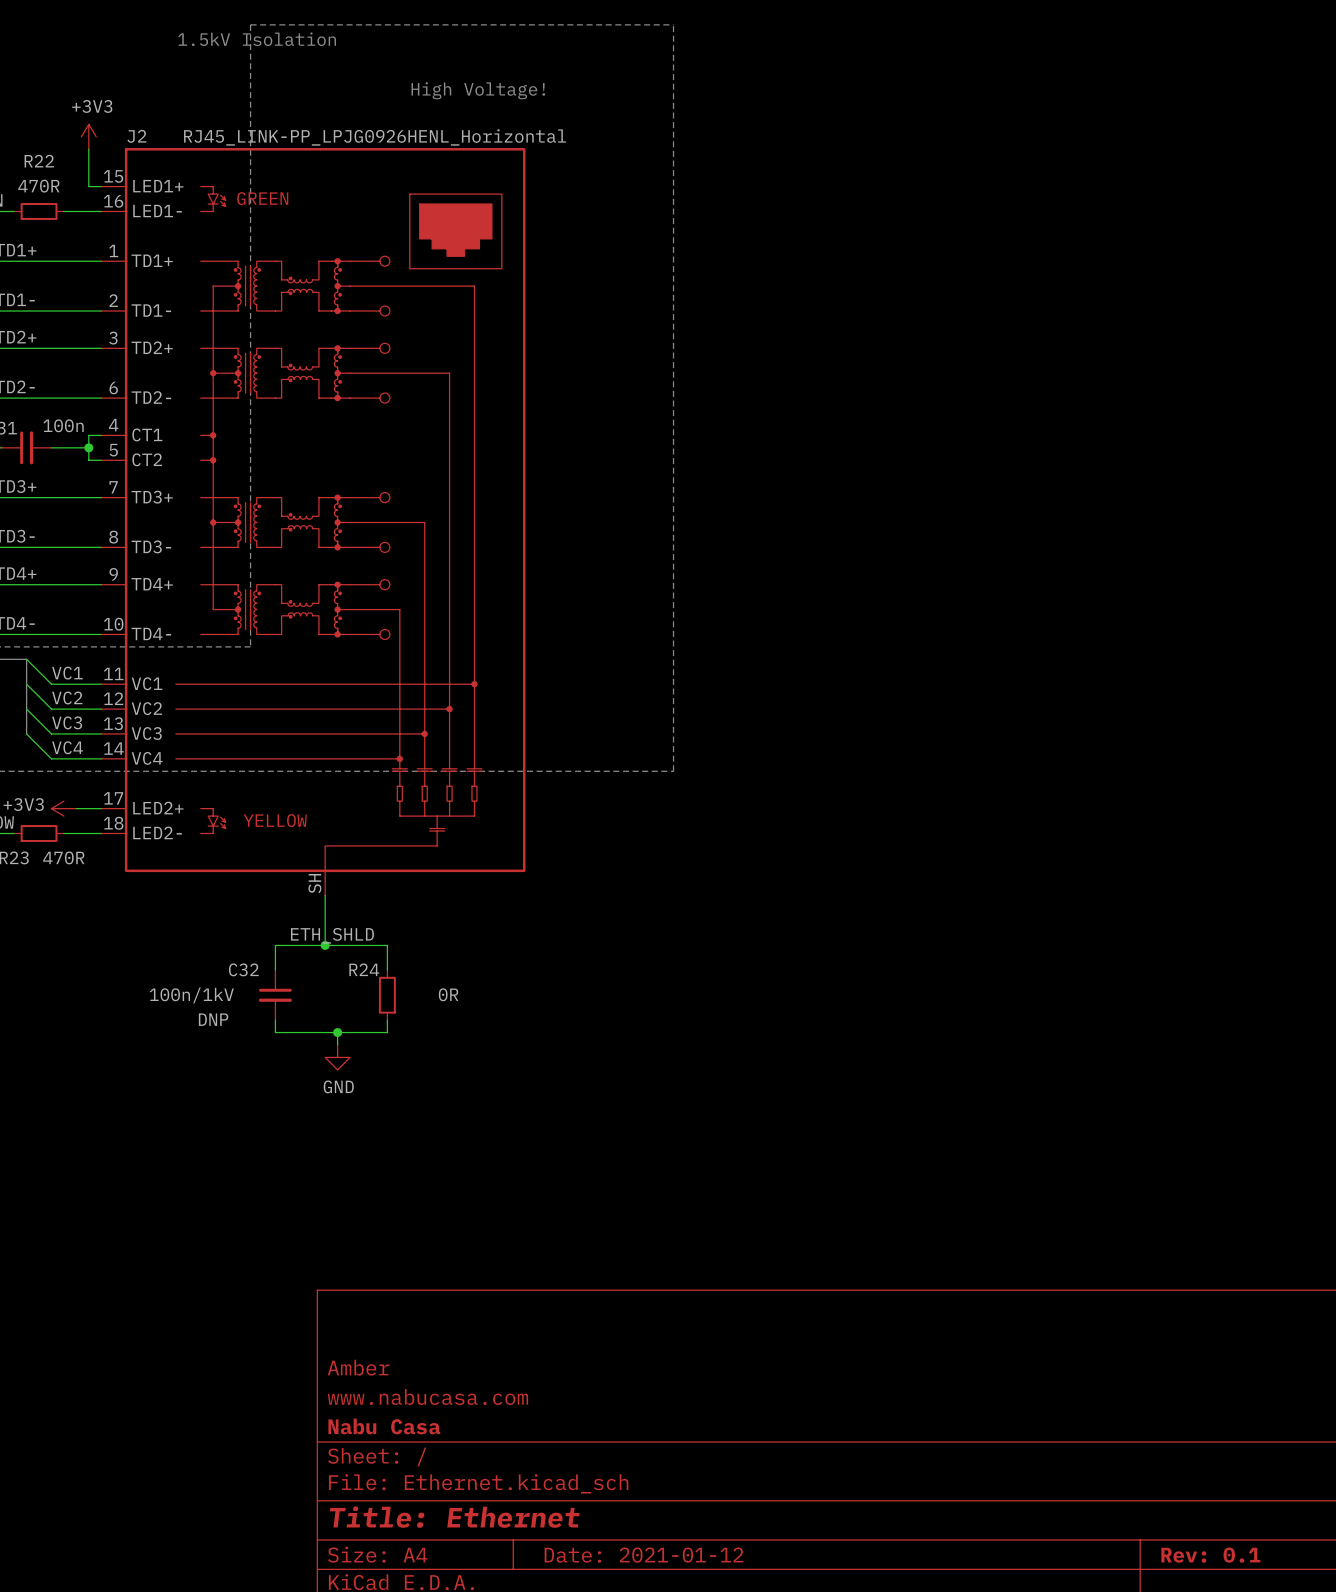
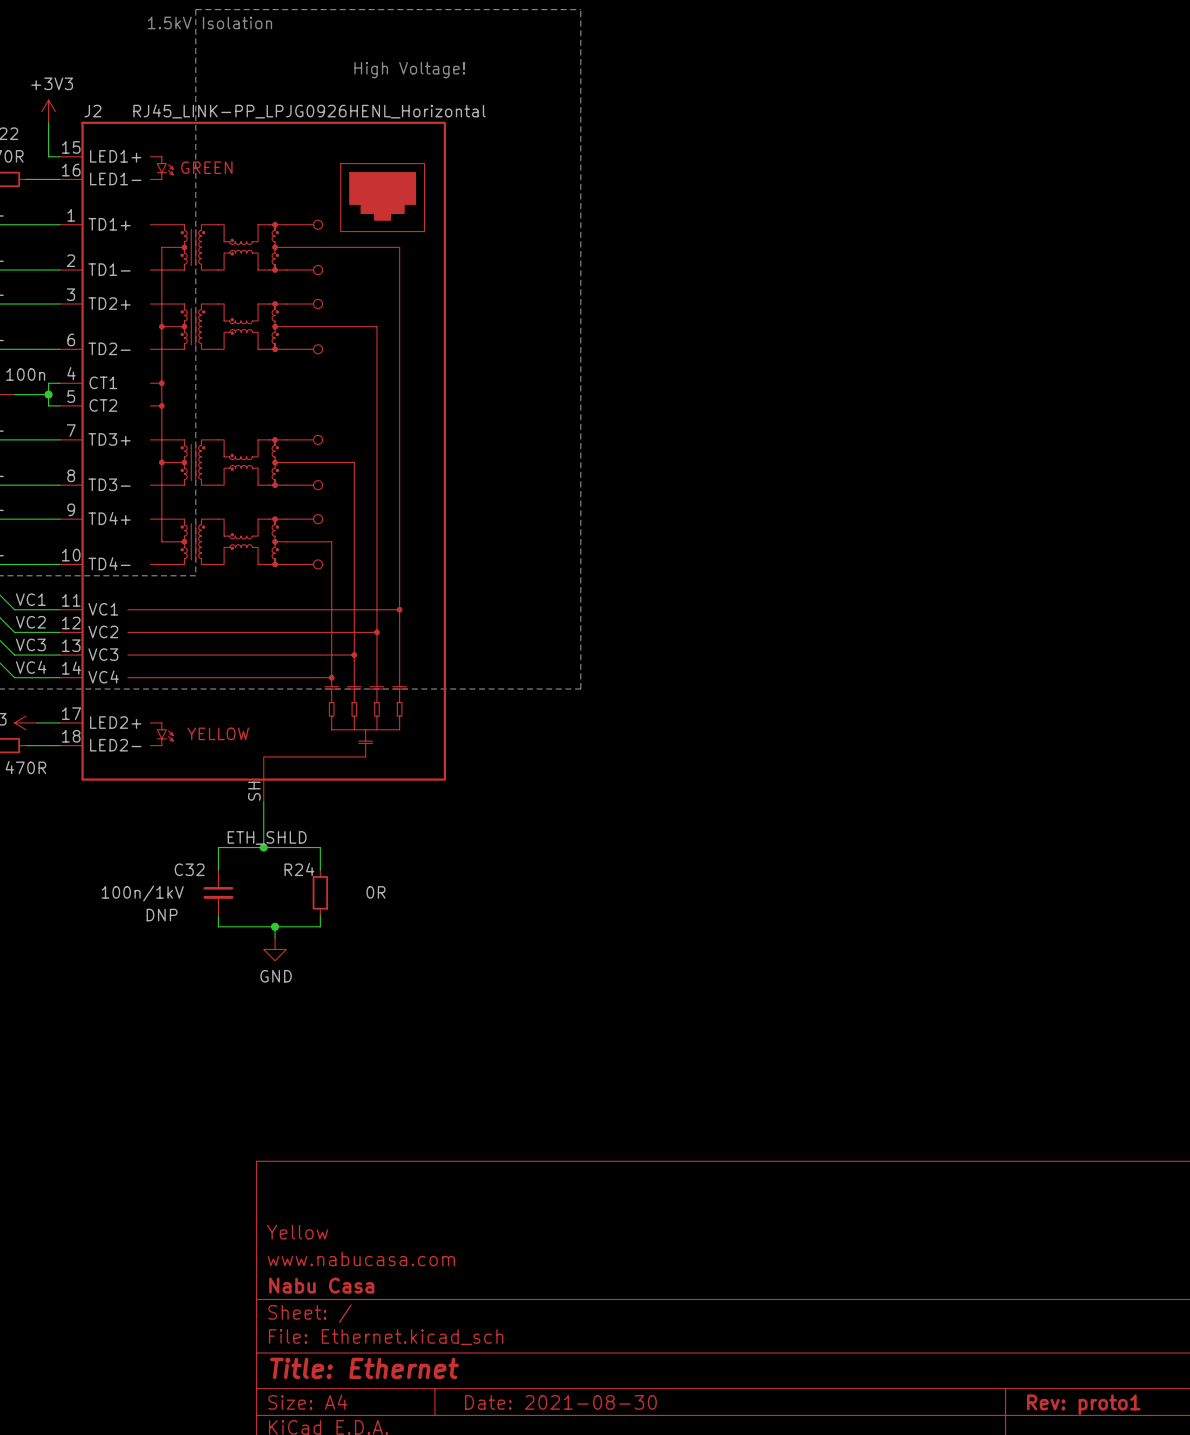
title block: Amber (358, 1367) -> Yellow (297, 1232)
title block: Date: 2021-01-12 (644, 1555) -> Date: 2021-08-30 (560, 1402)
title block: Rev: 0.1 (1210, 1555) -> Rev: proto1 (1083, 1404)

